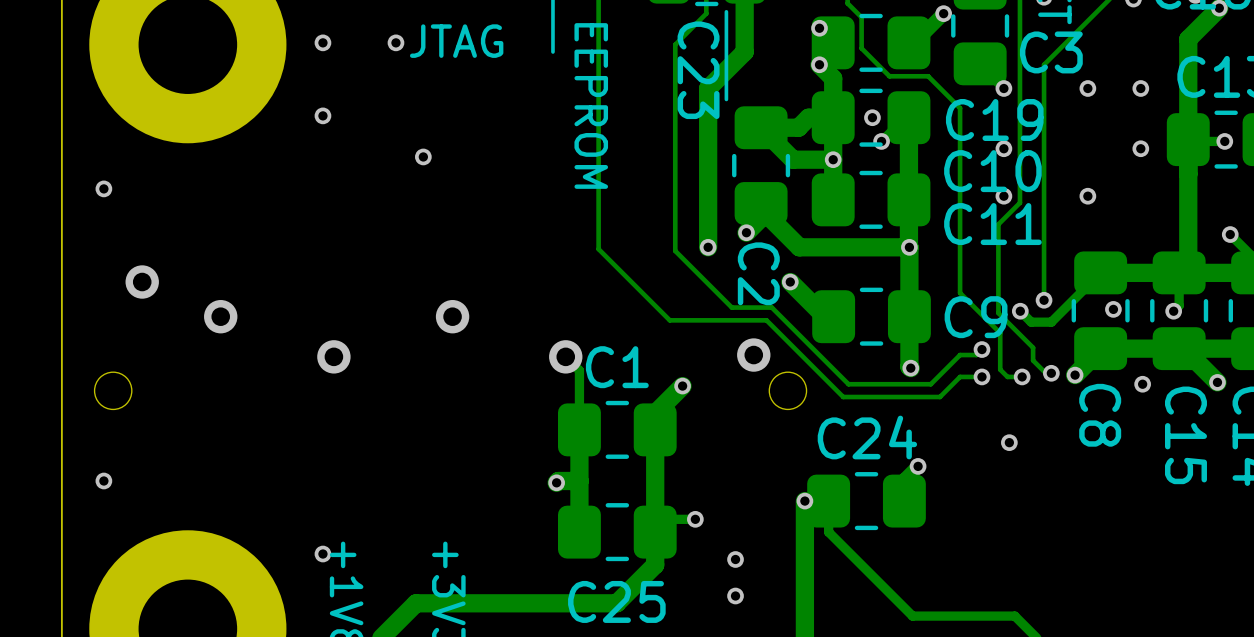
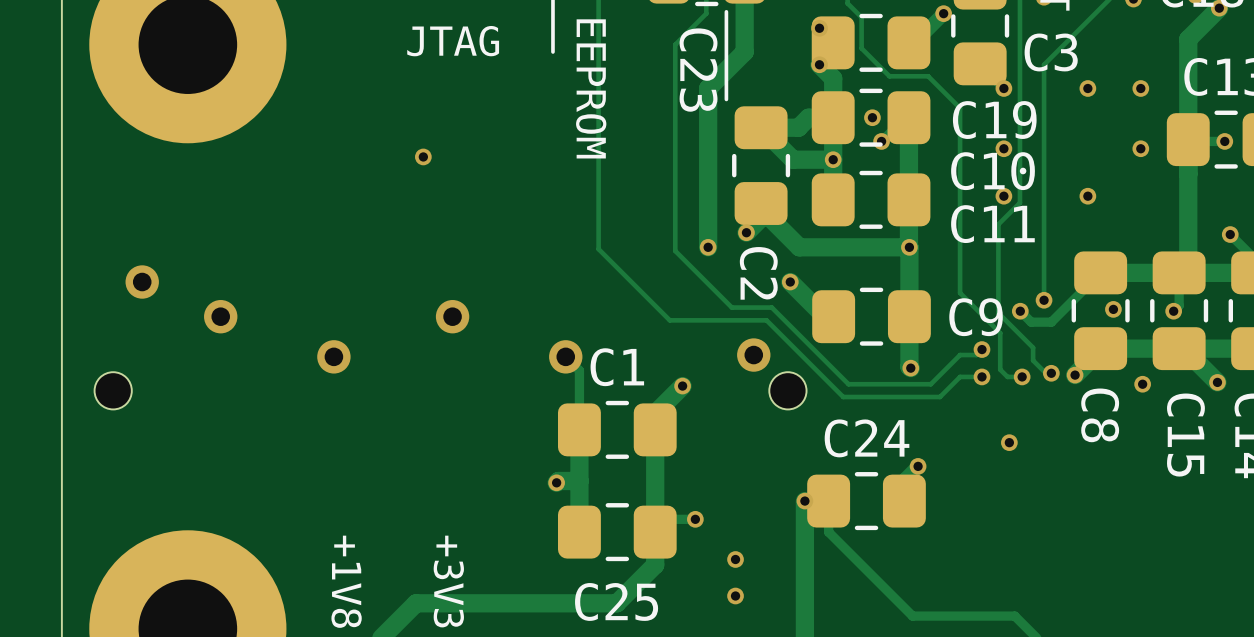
via: (322, 42) -> none
via: (395, 42) -> none
via: (322, 115) -> none
via: (103, 188) -> none
via: (103, 480) -> none
via: (322, 554) -> none

